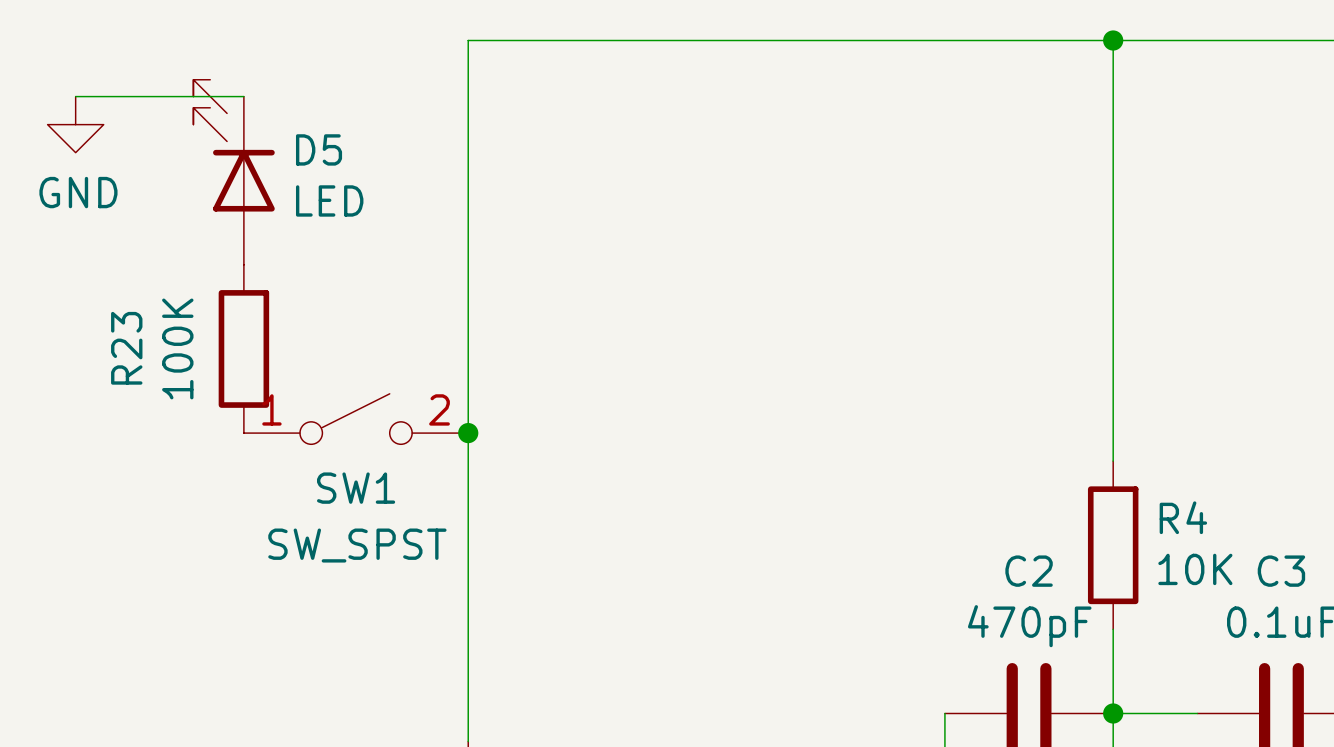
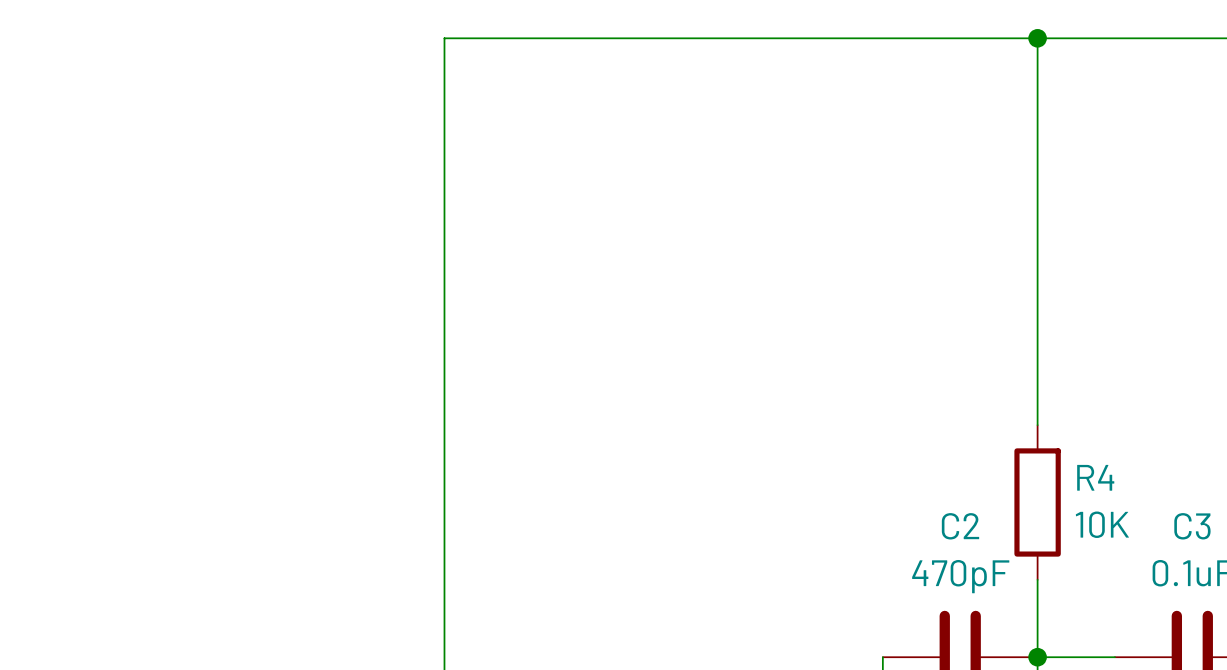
wire: (75, 96) (243, 96) -> none
power symbol: GND (75, 124) -> none
D5: LED (234, 172) -> none
R23: 100K (243, 348) -> none
SW1: SW_SPST (356, 419) -> none
junction: (468, 433) -> none

